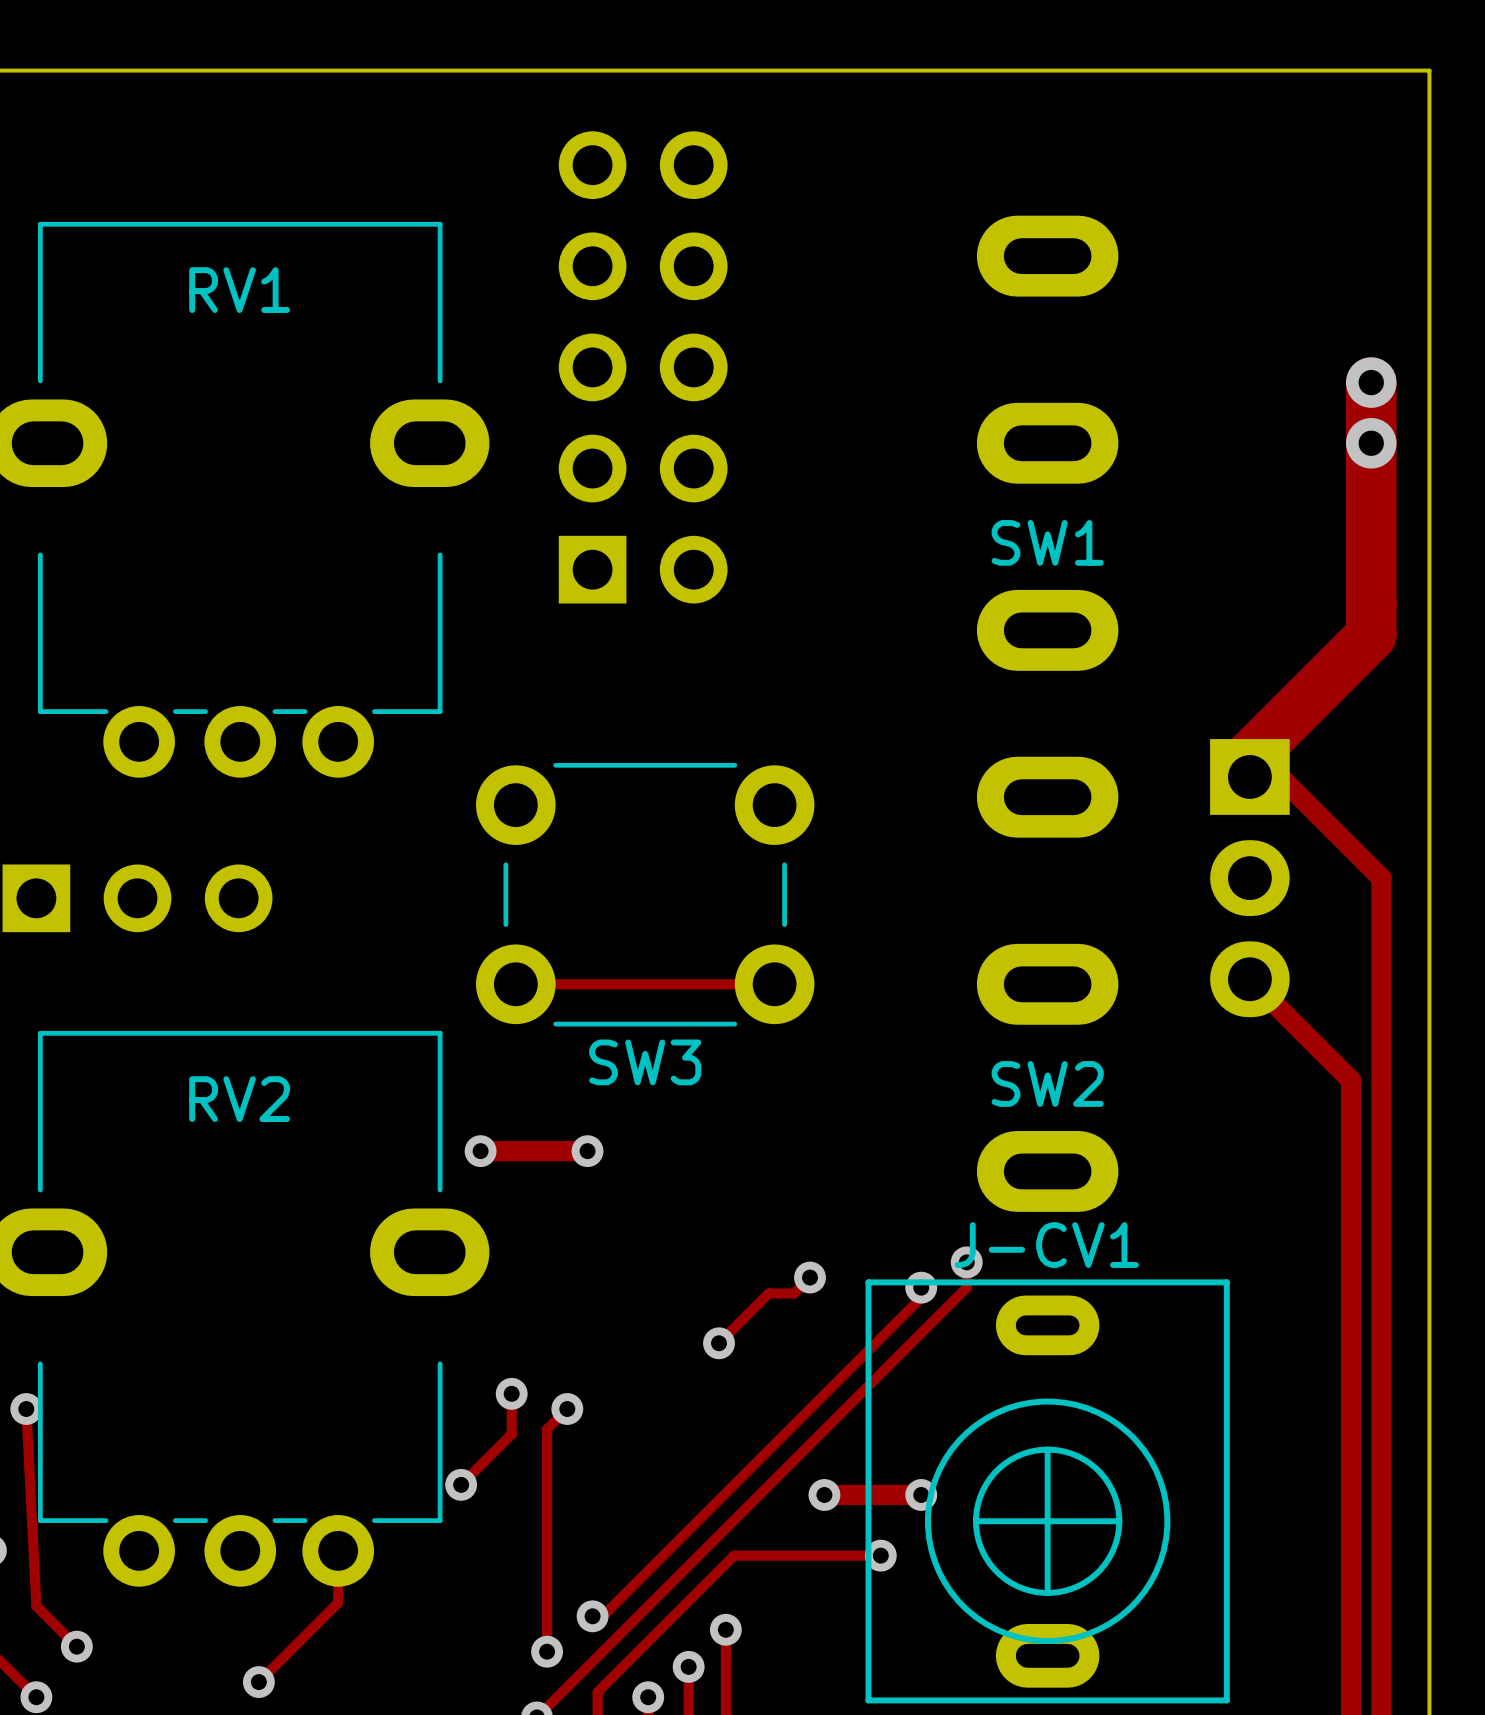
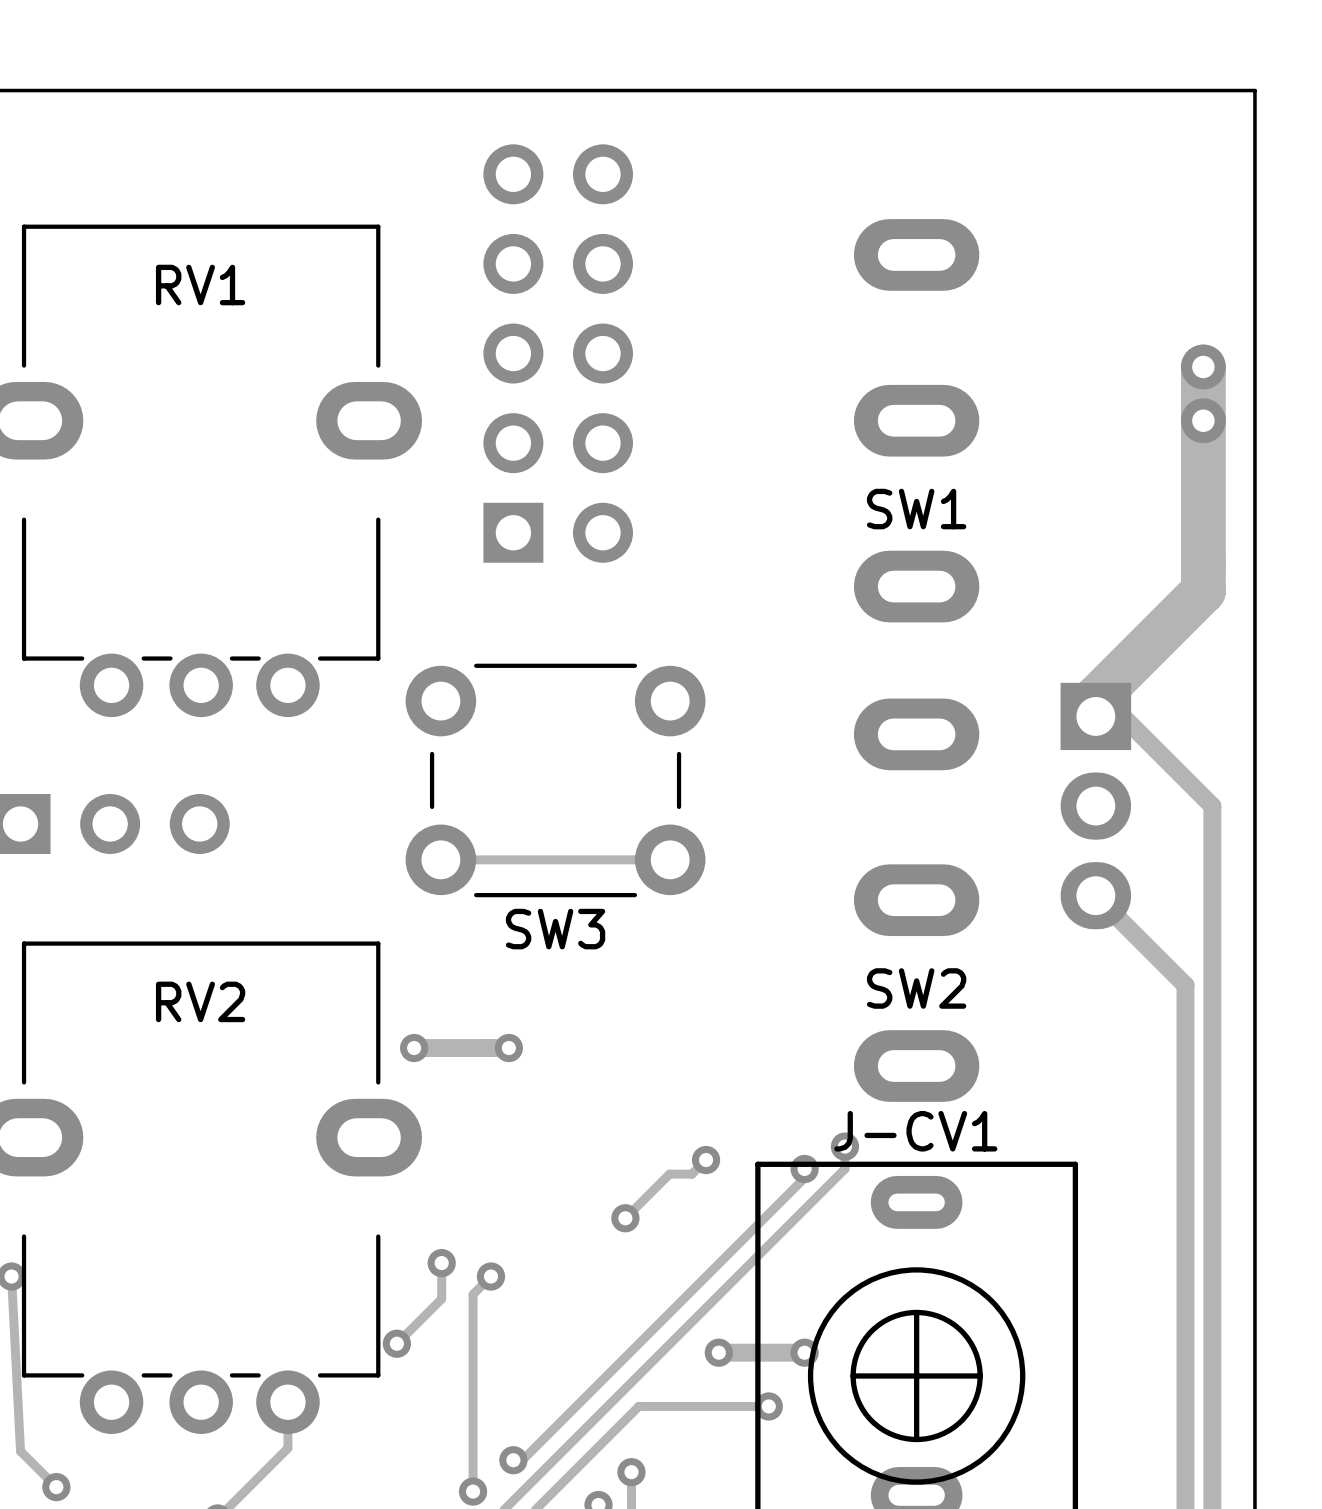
SW3 position: (645, 894) -> (555, 780)
track: (515, 984) (774, 984) -> (440, 859) (670, 859)

